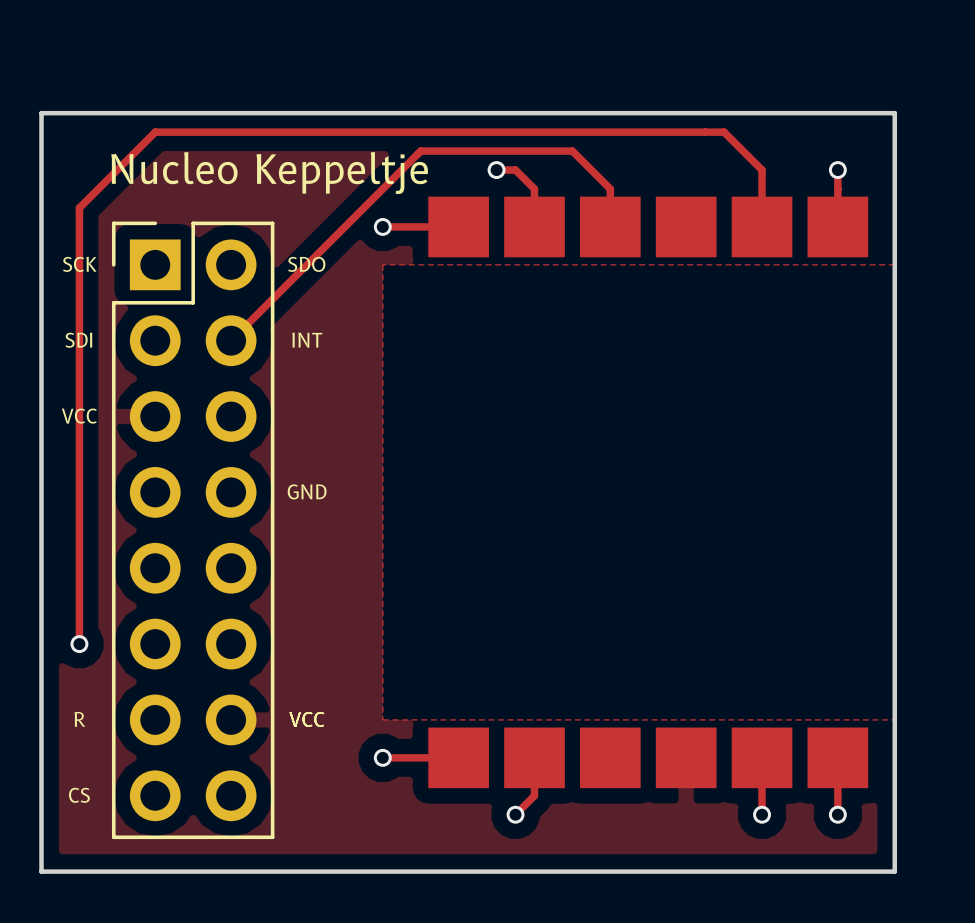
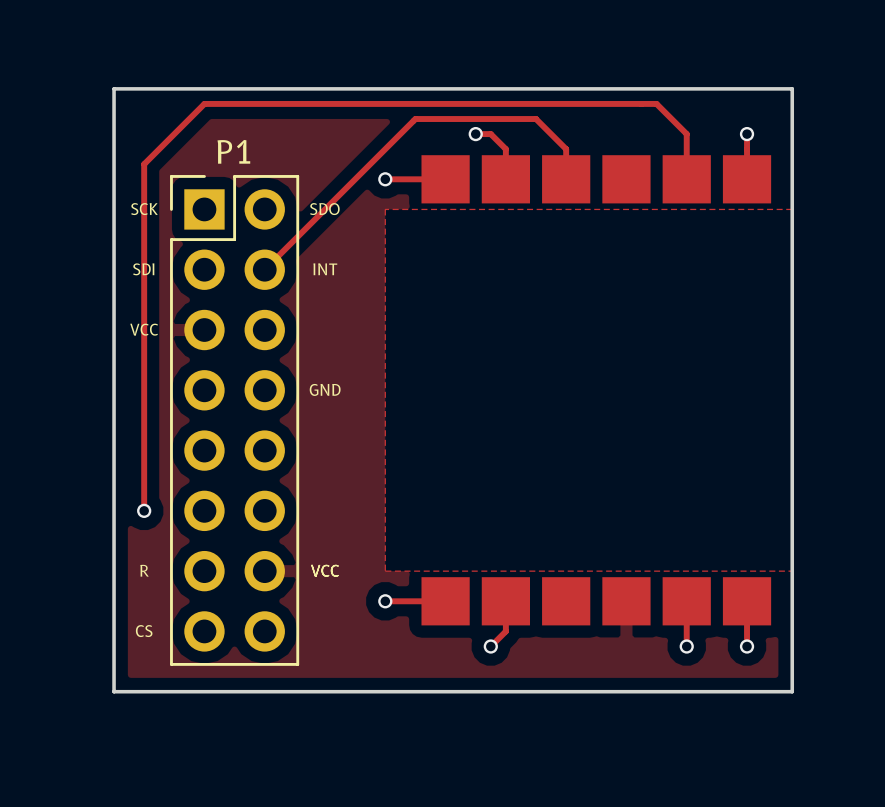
text: Nucleo Keppeltje (269, 173) -> none
P1 name: none -> P1 (233, 151)

